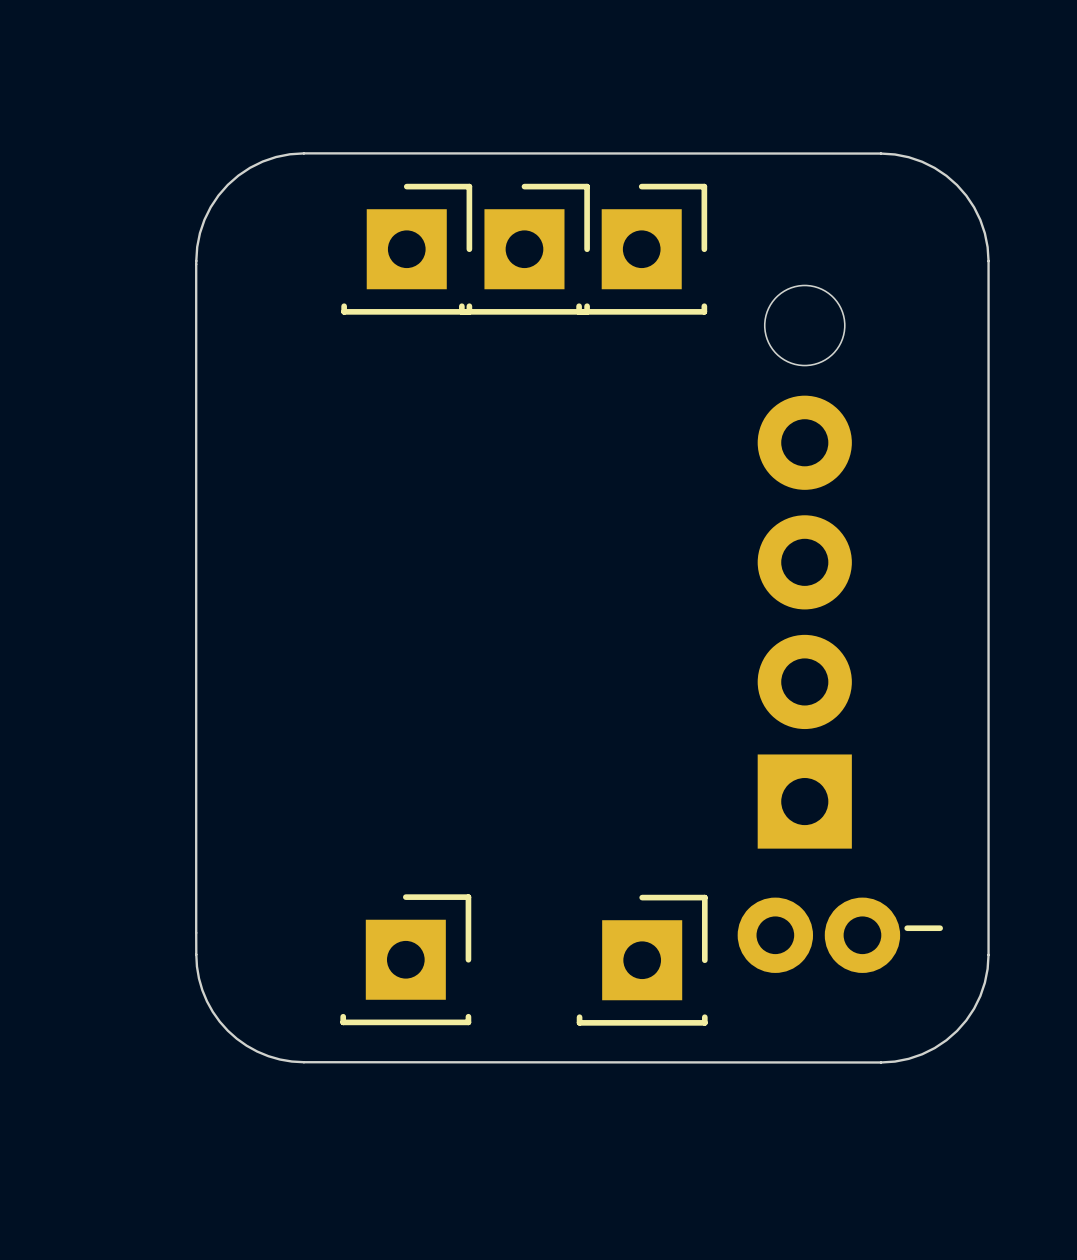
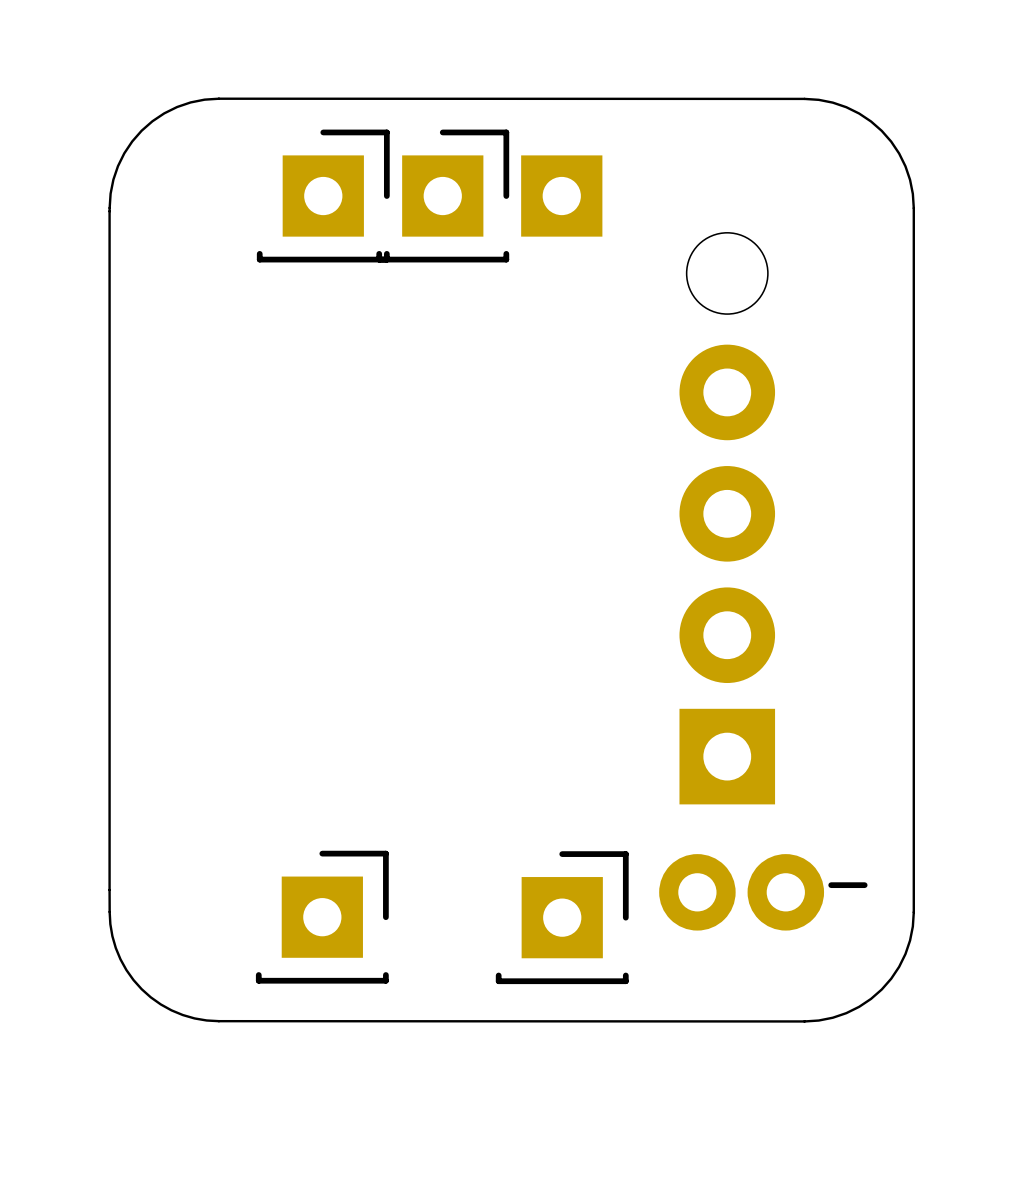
part footprint: [576, 183, 708, 315] -> [521, 155, 603, 237]

